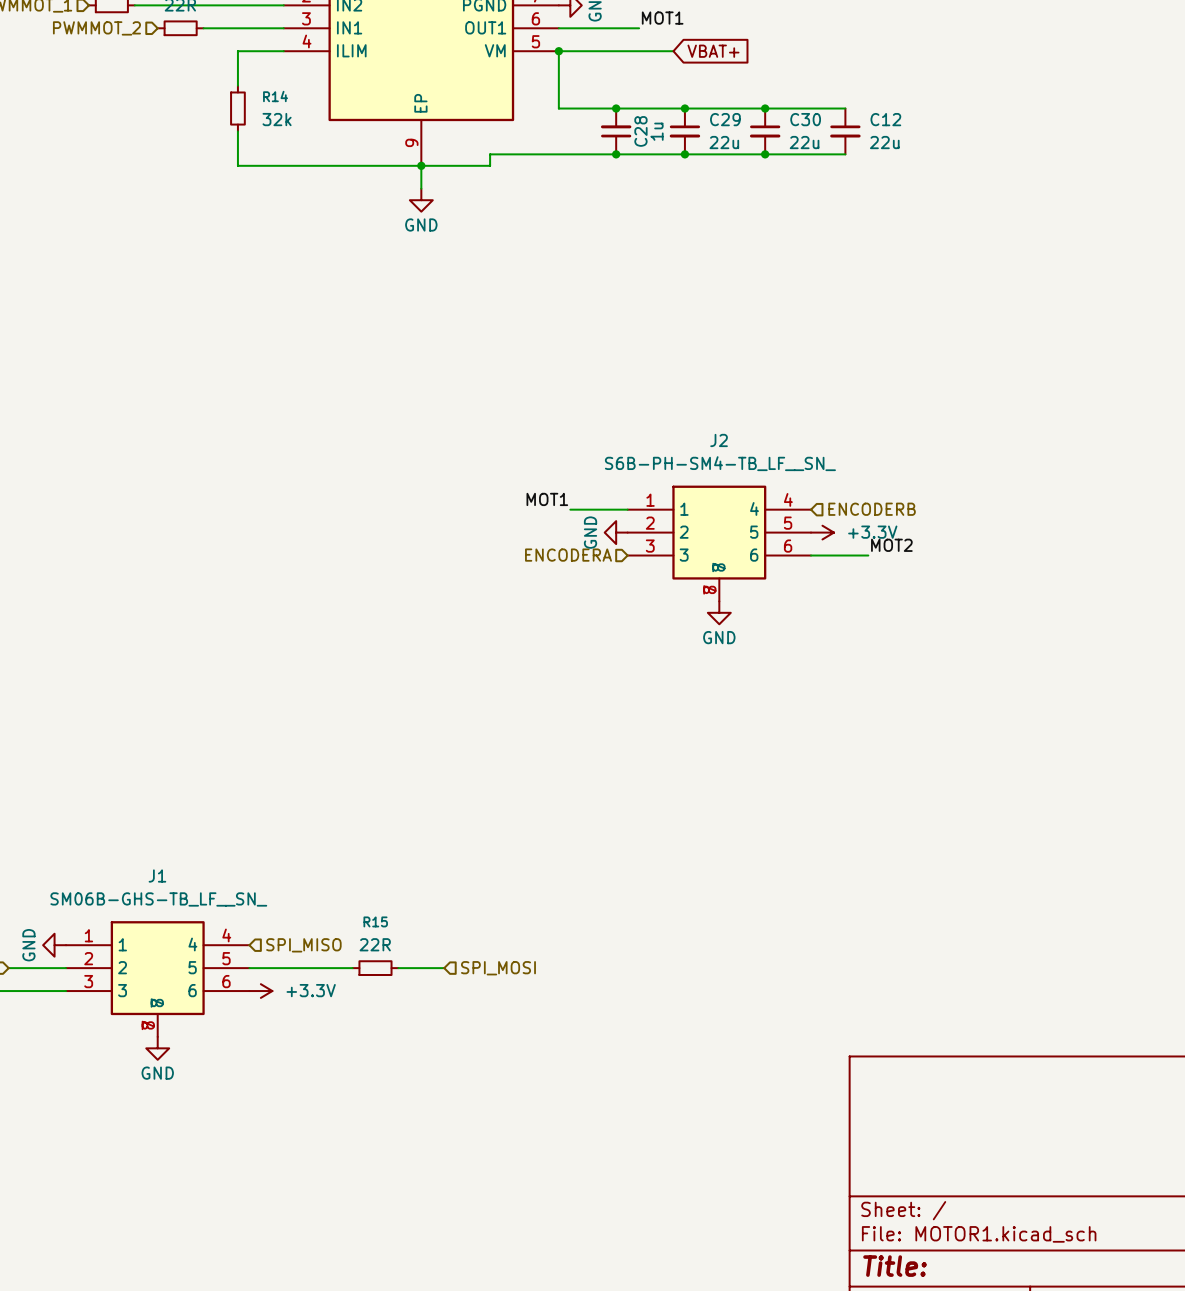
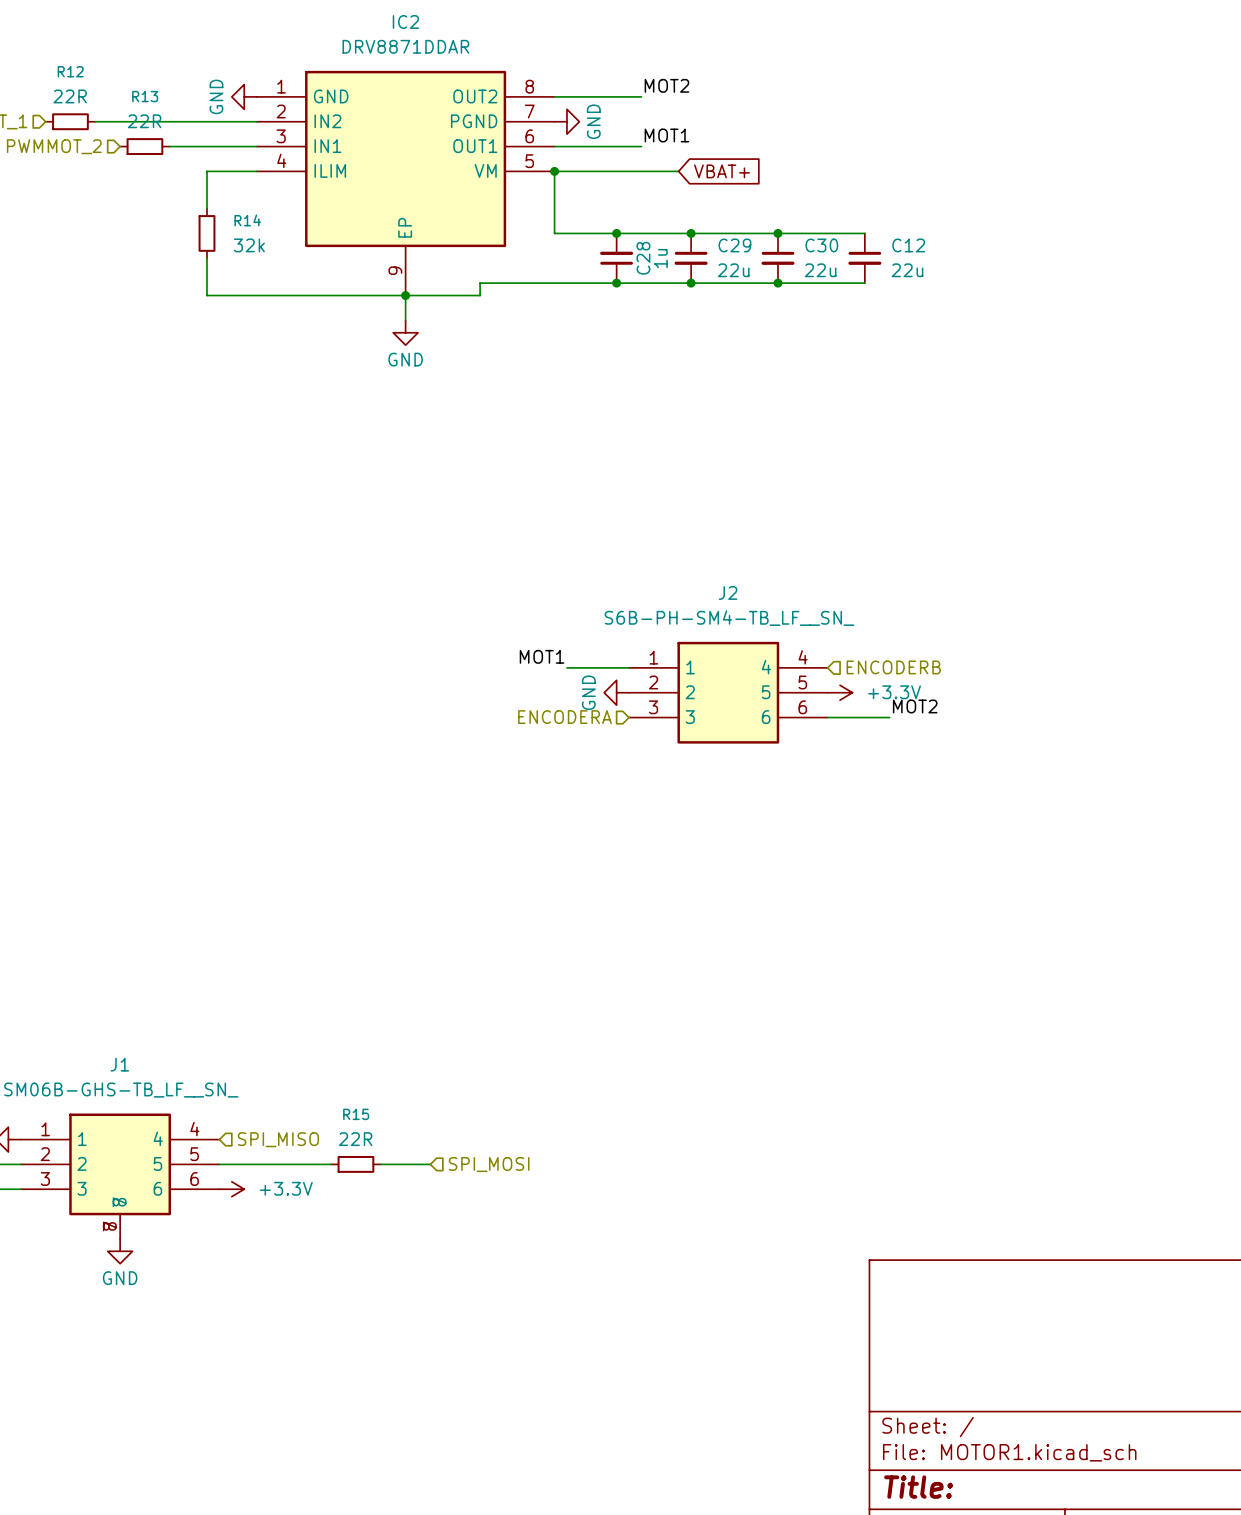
J2 symbol: [627, 485, 812, 602] -> [629, 641, 828, 744]
power symbol: GND (719, 612) -> none

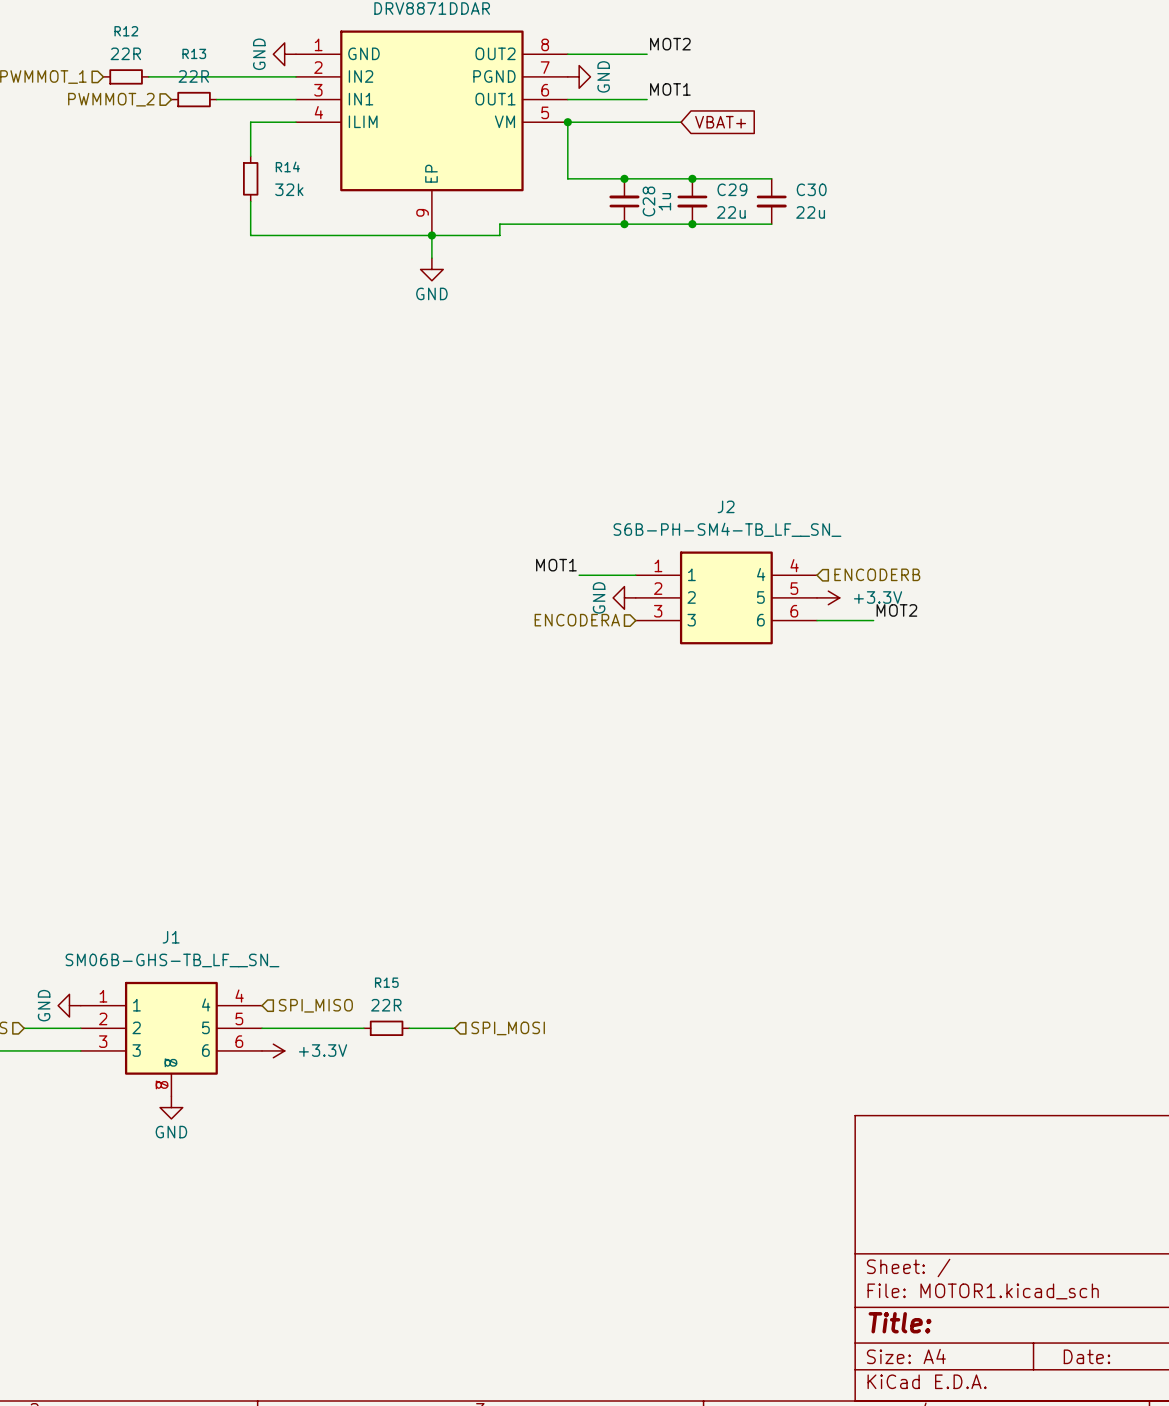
wire: (777, 233) (864, 233) -> none
junction: (777, 233) -> none
C12: 22u (864, 258) -> none
wire: (777, 283) (864, 283) -> none
junction: (777, 283) -> none

